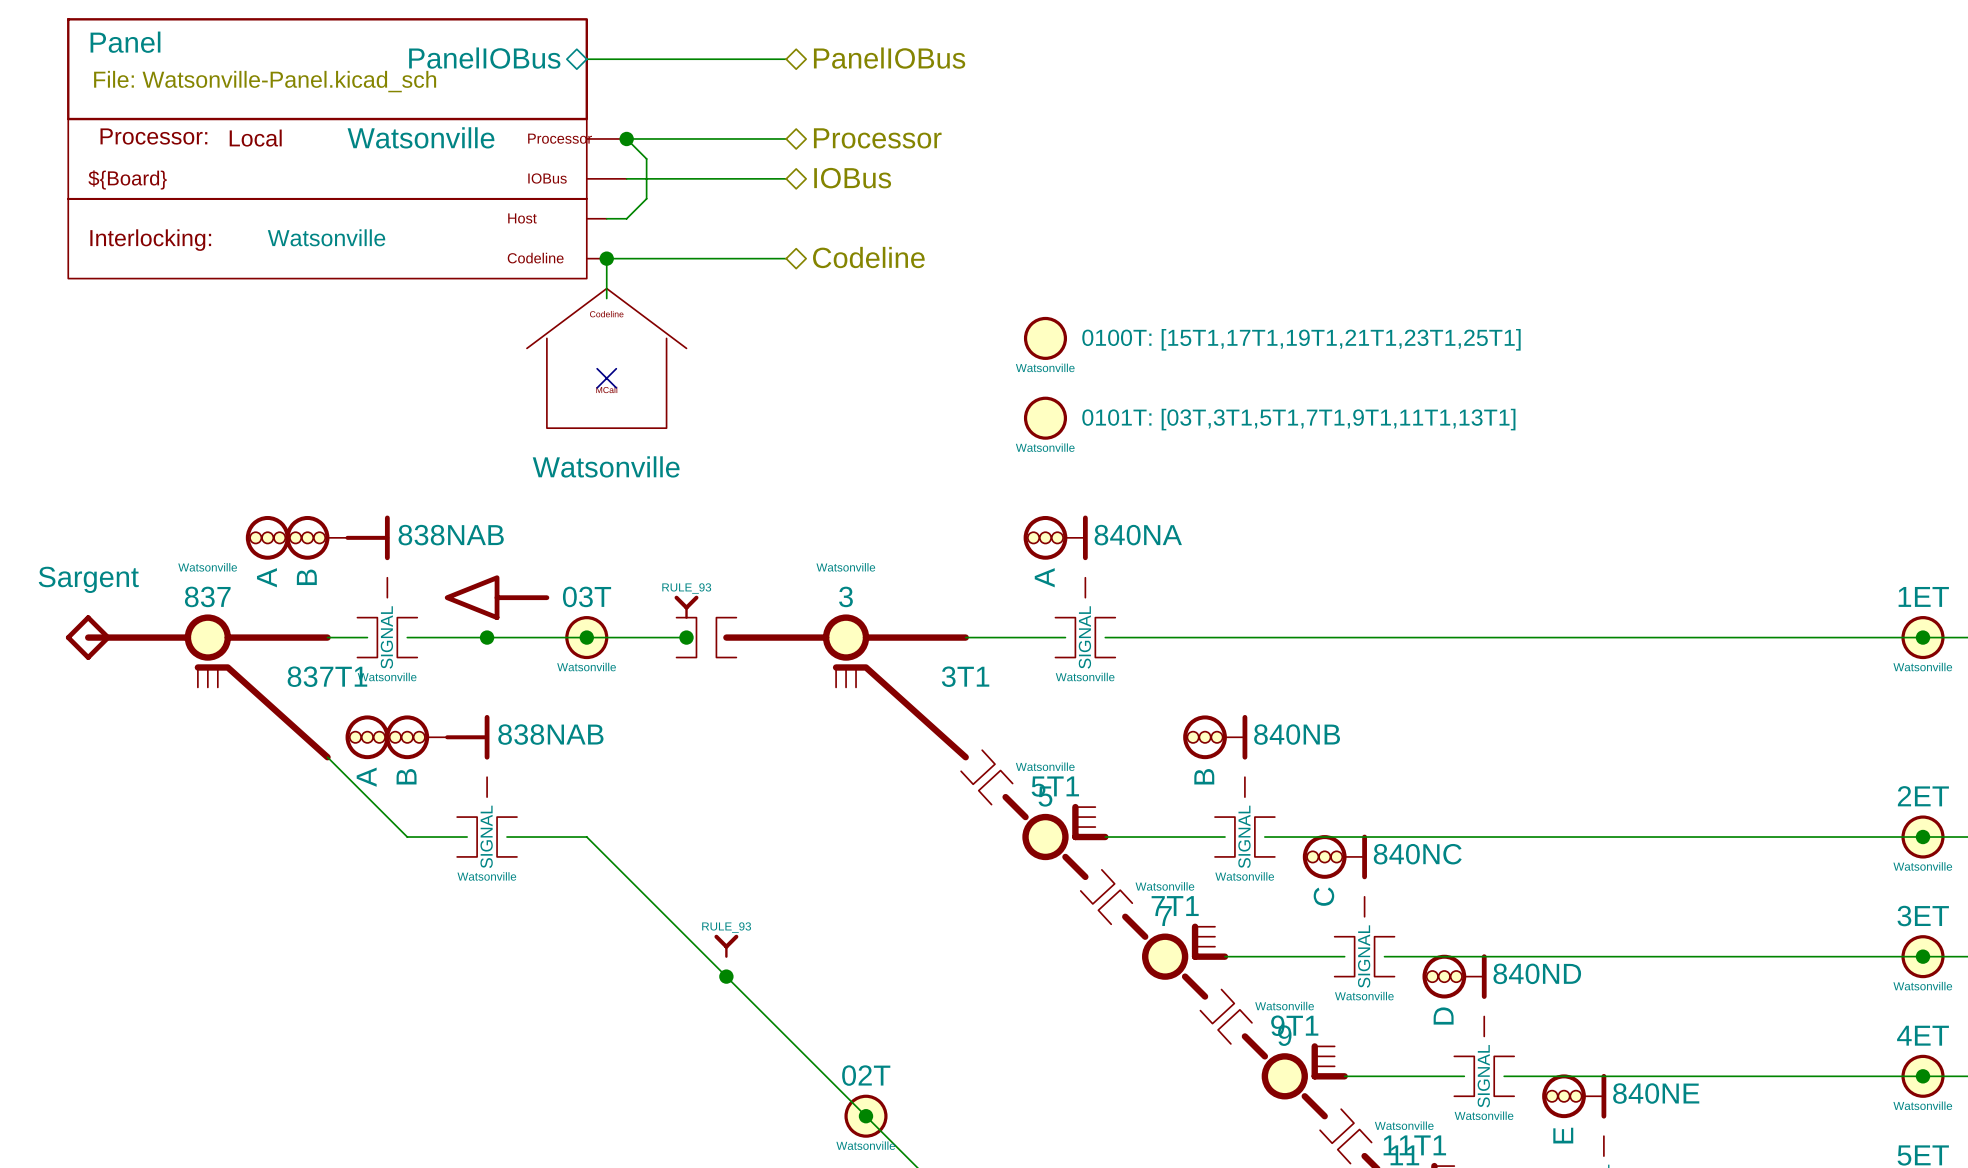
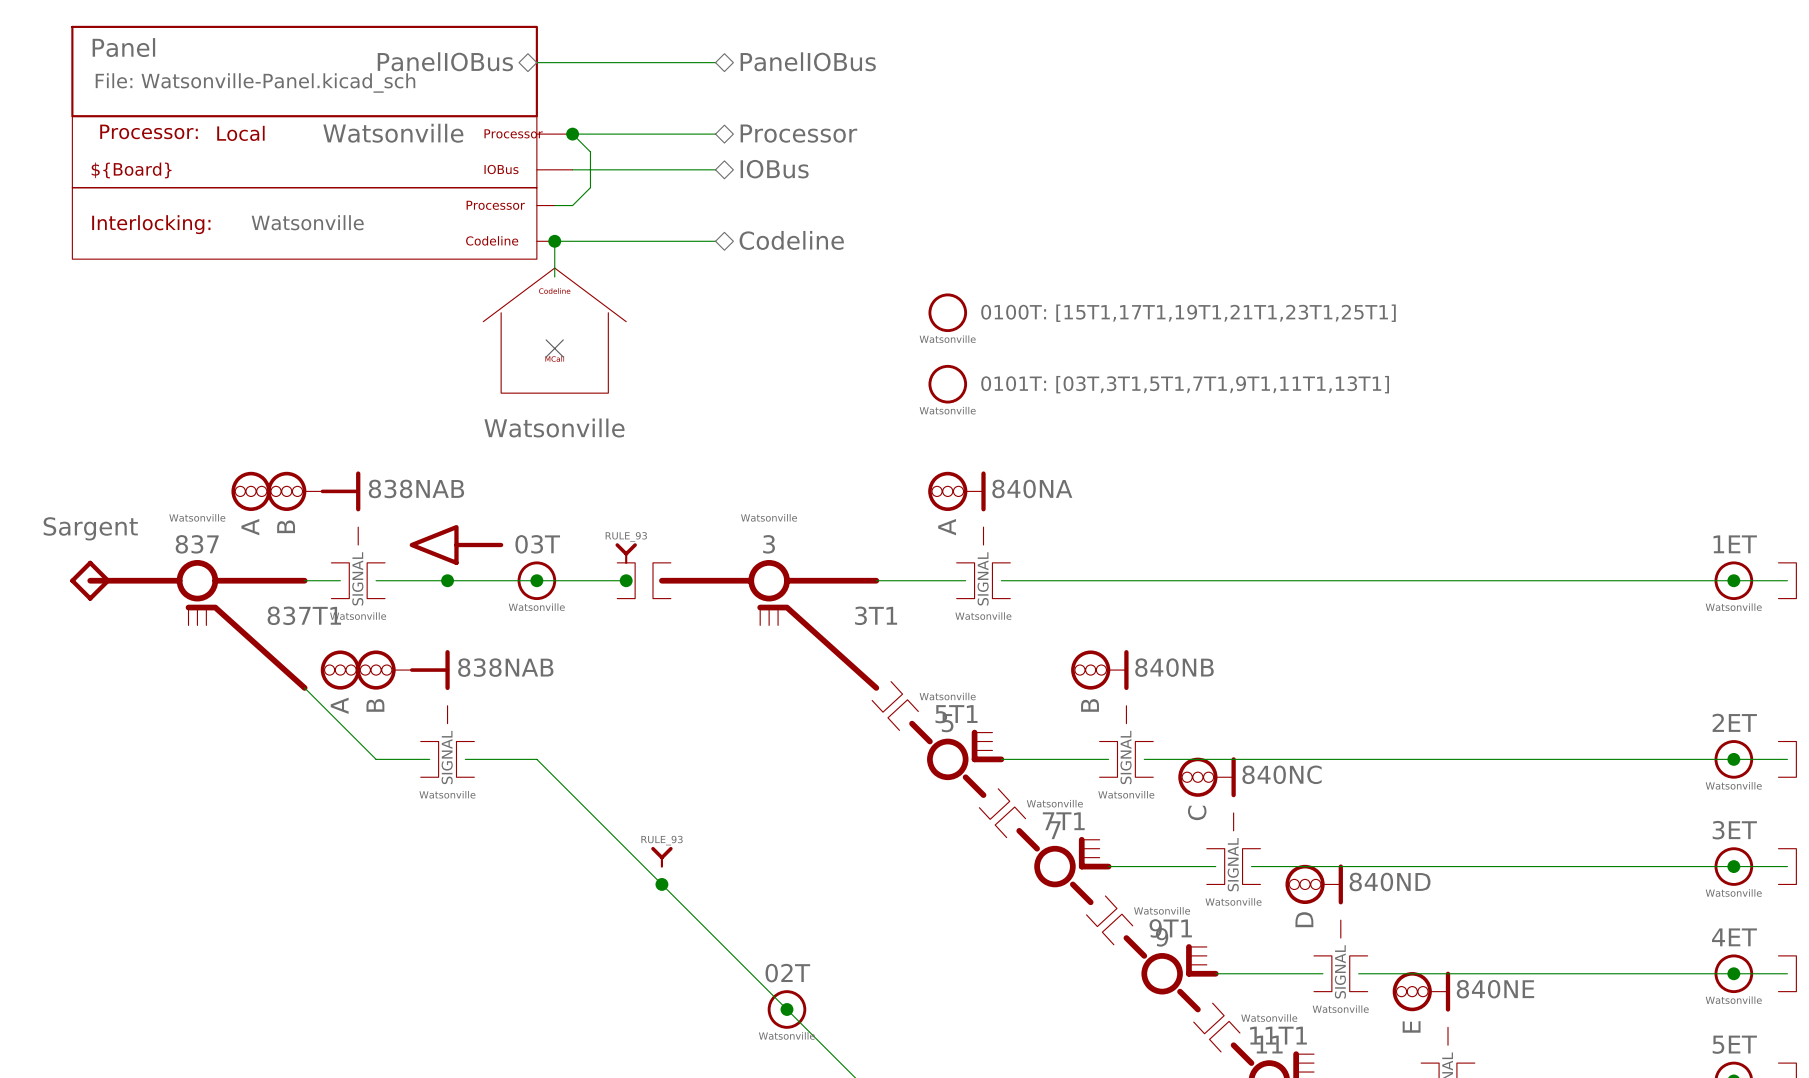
part text: Host (522, 218) -> Processor (495, 205)

